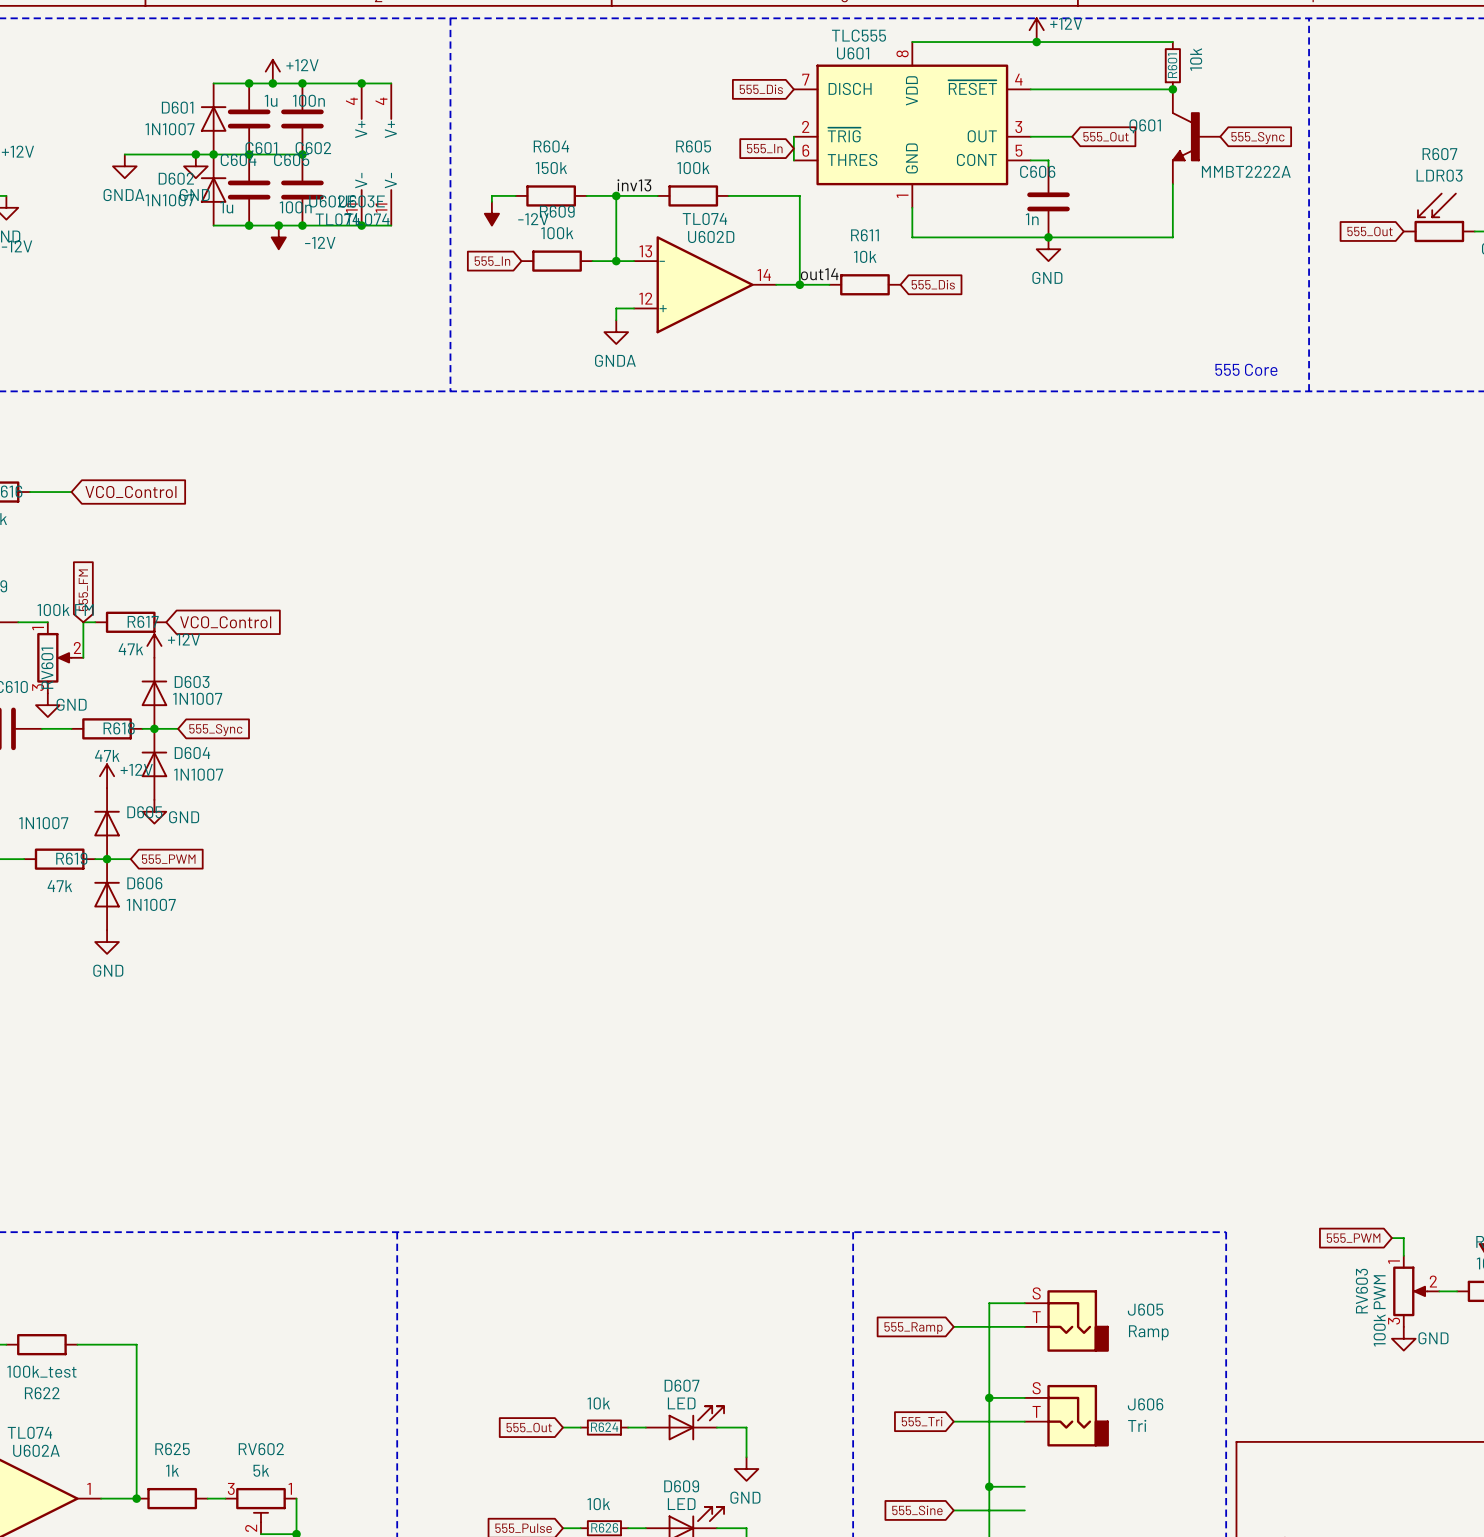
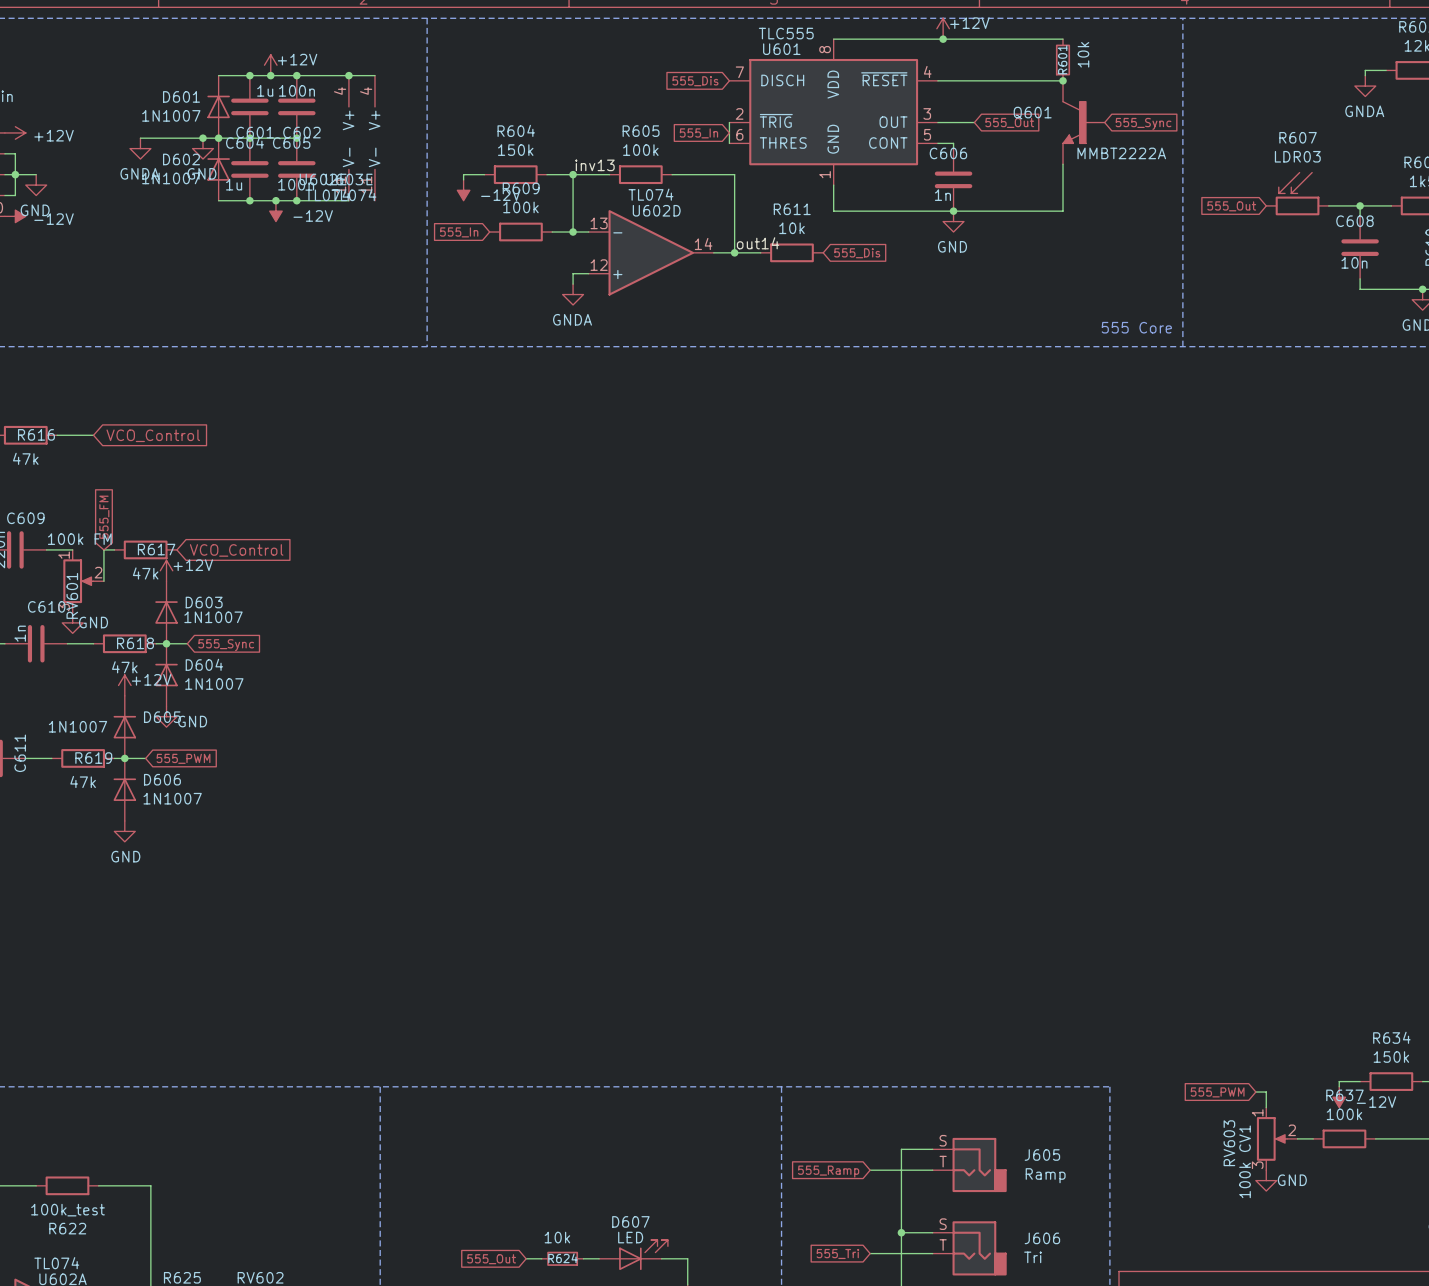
wire: (361, 225) (391, 225) -> none
junction: (361, 225) -> none
RV603 value: 100k PWM (1379, 1310) -> 100k CV1 (1245, 1161)

